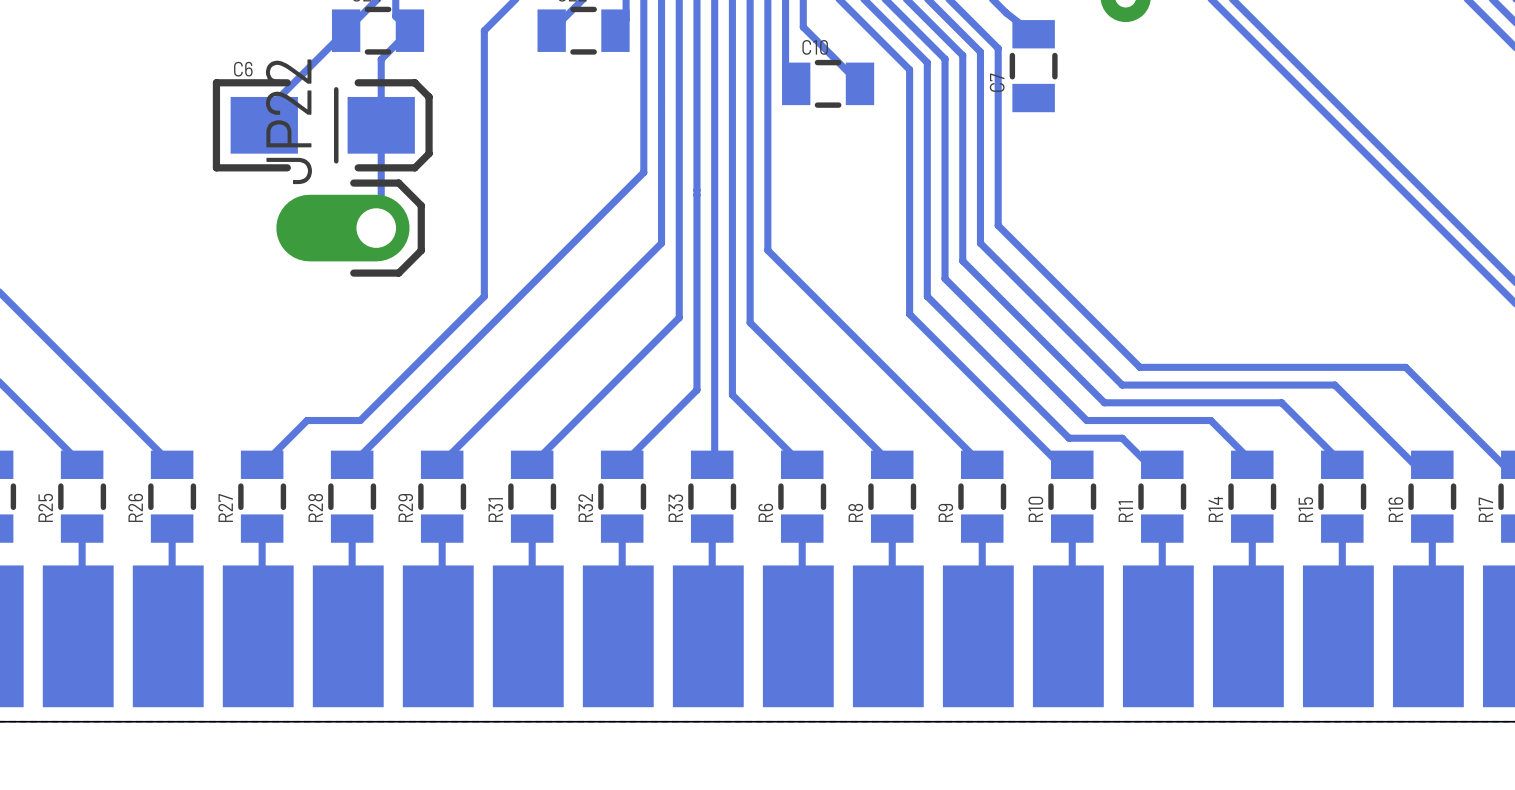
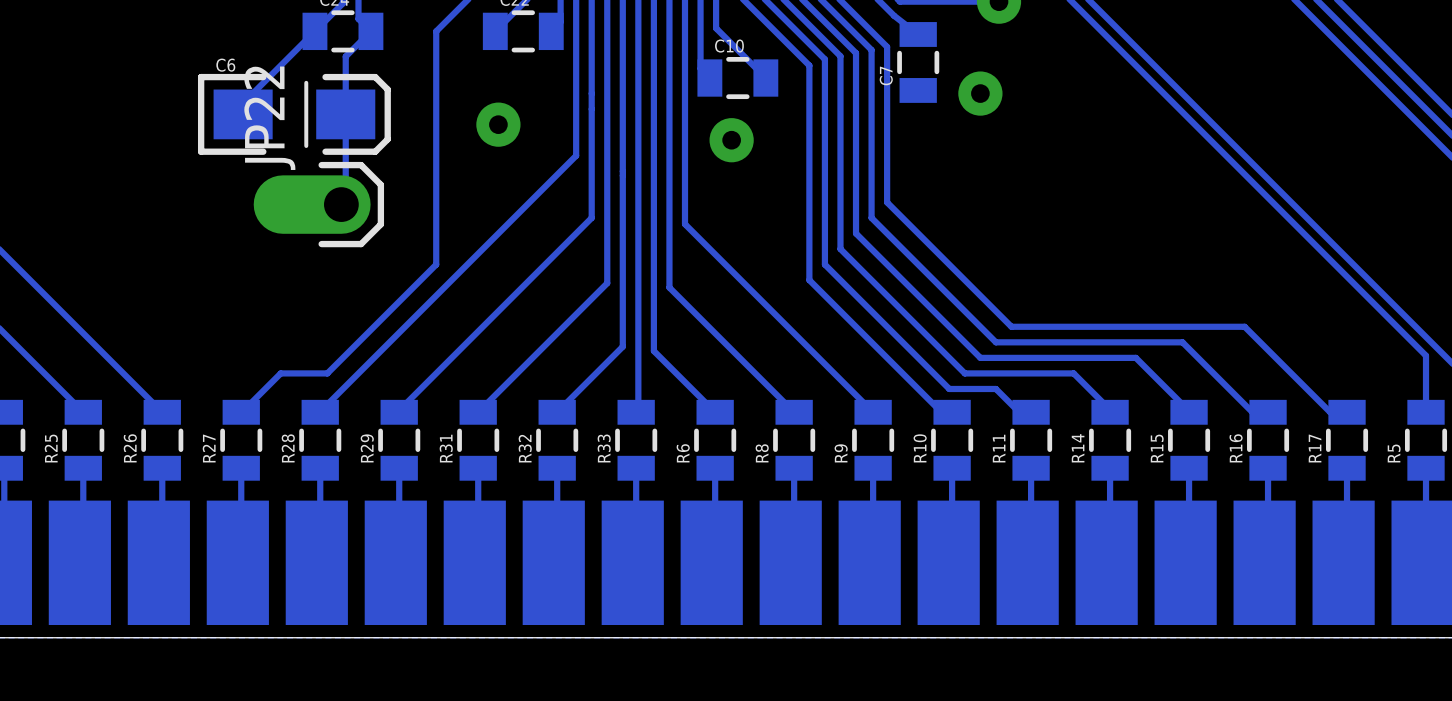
via: none -> (980, 93)
via: none -> (498, 124)
via: none -> (731, 140)

